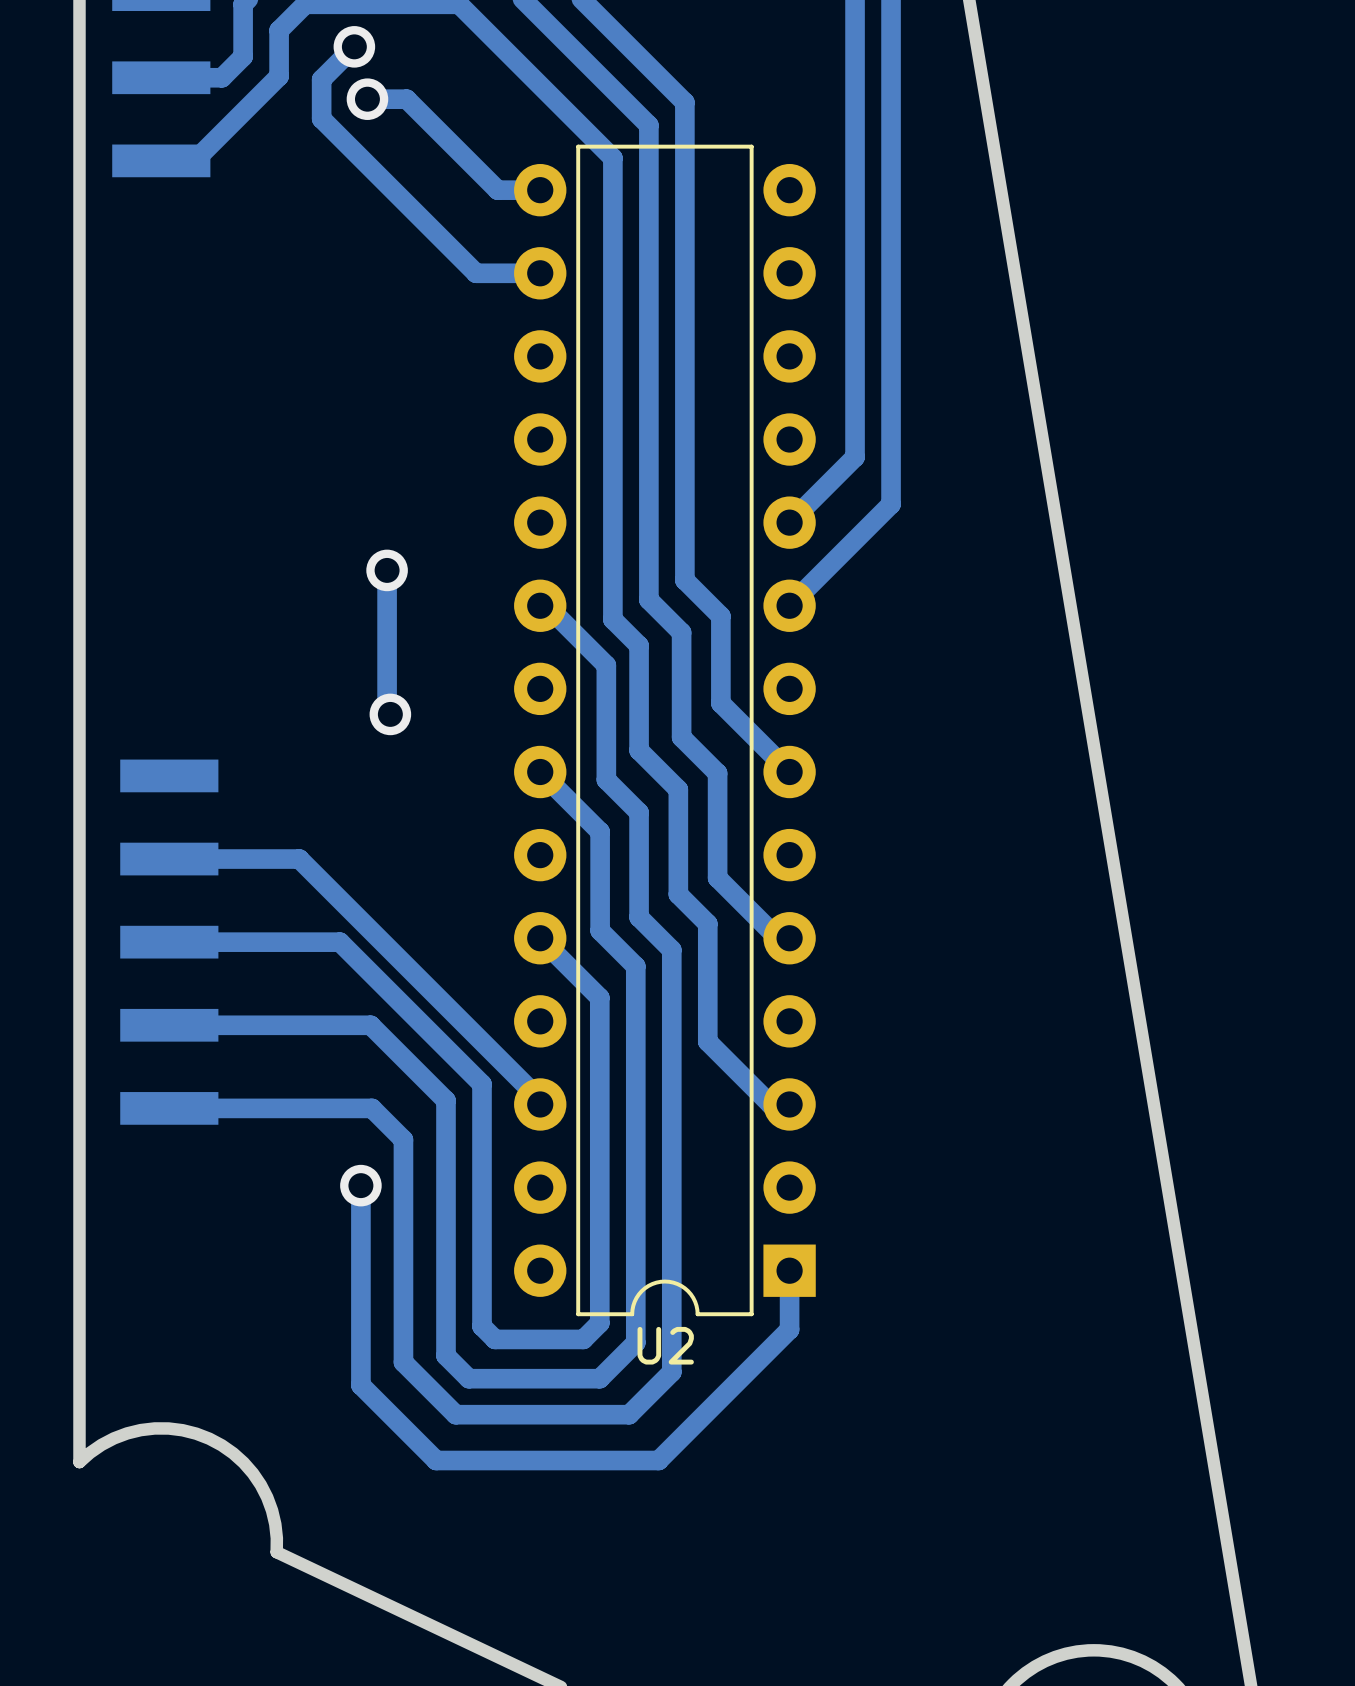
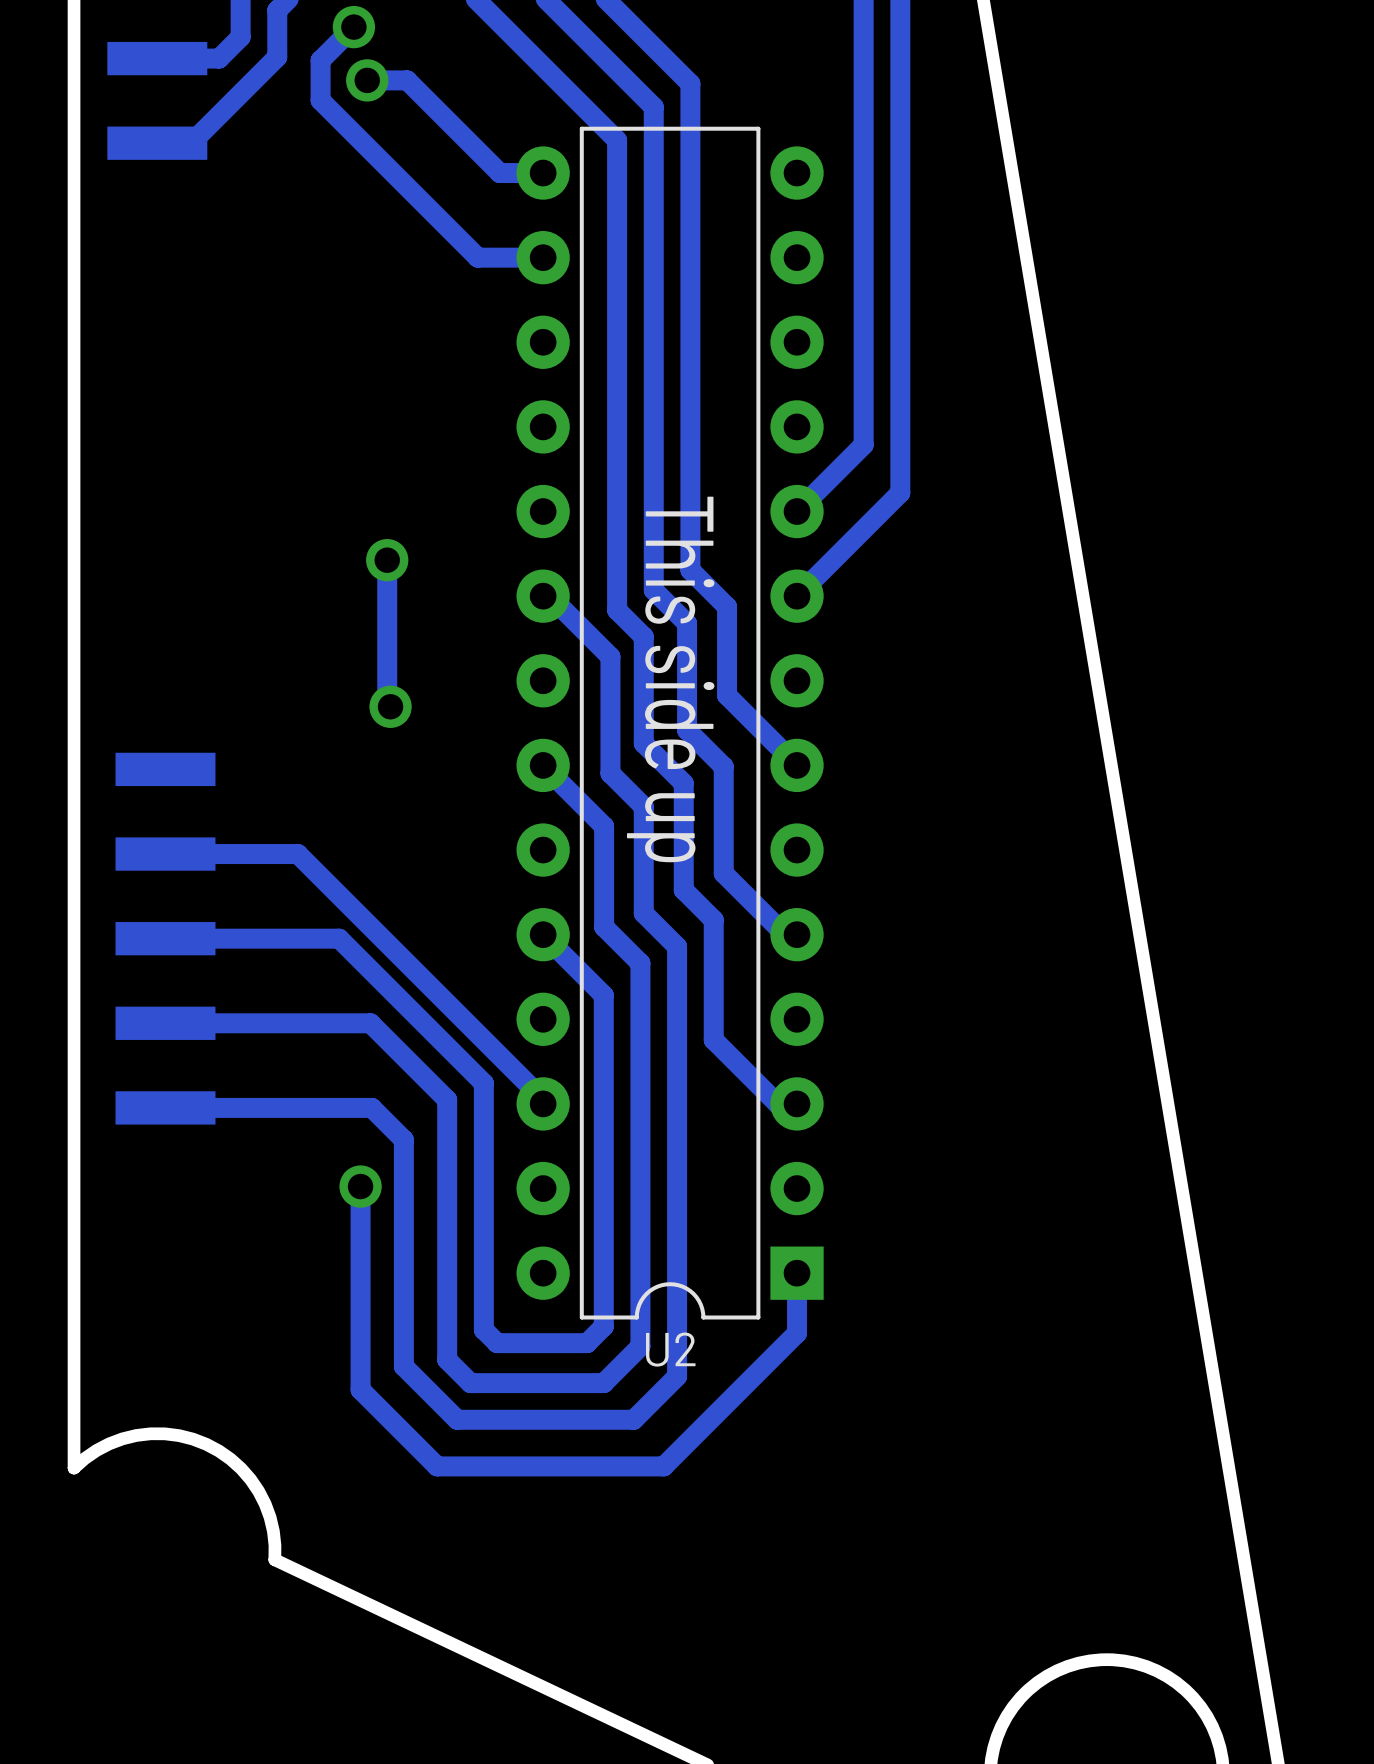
text: none -> This side up (670, 679)

